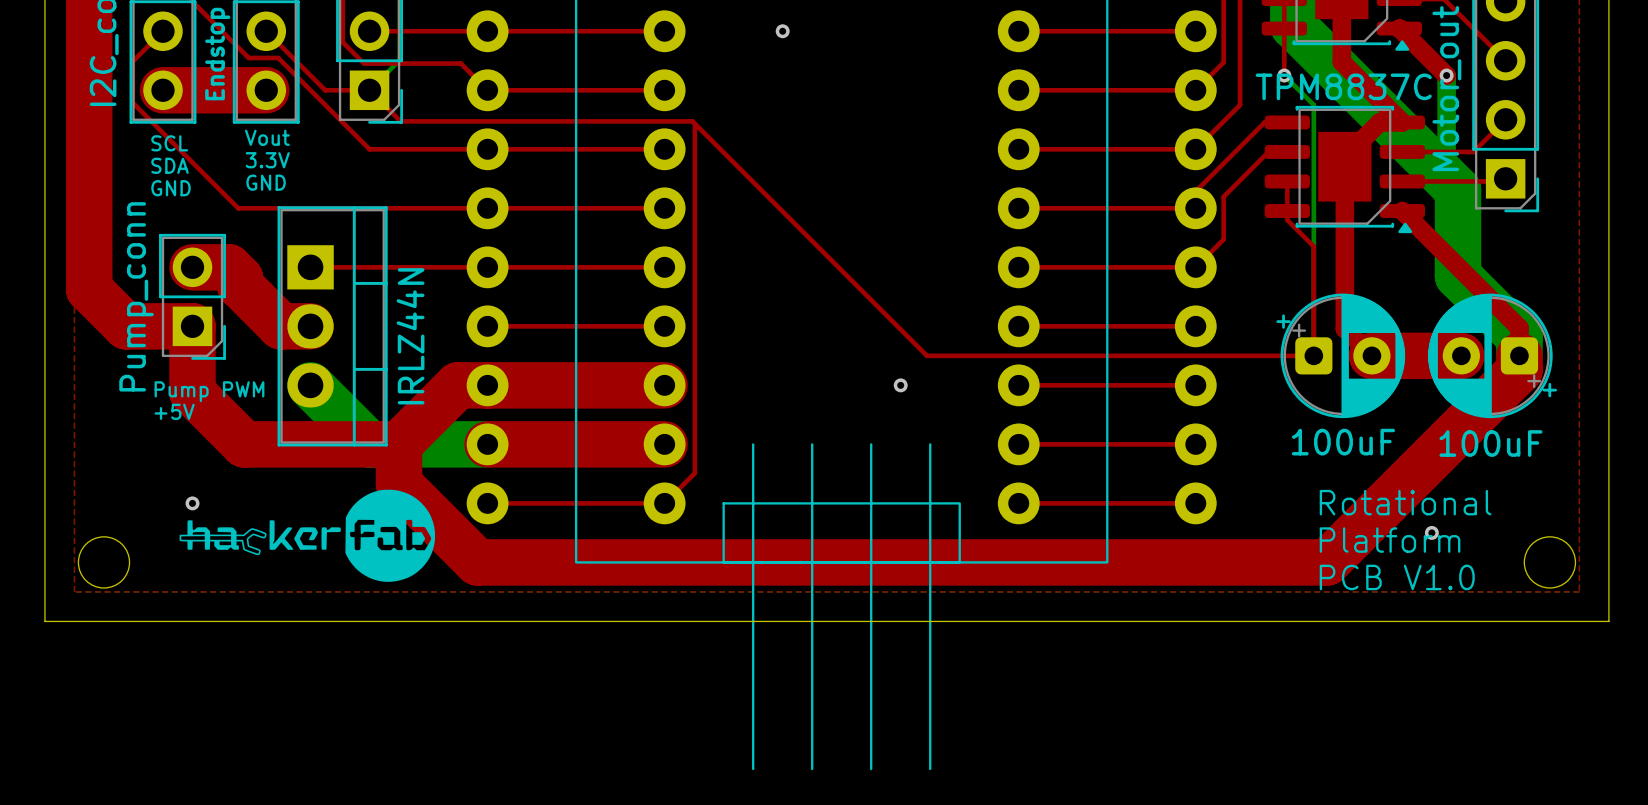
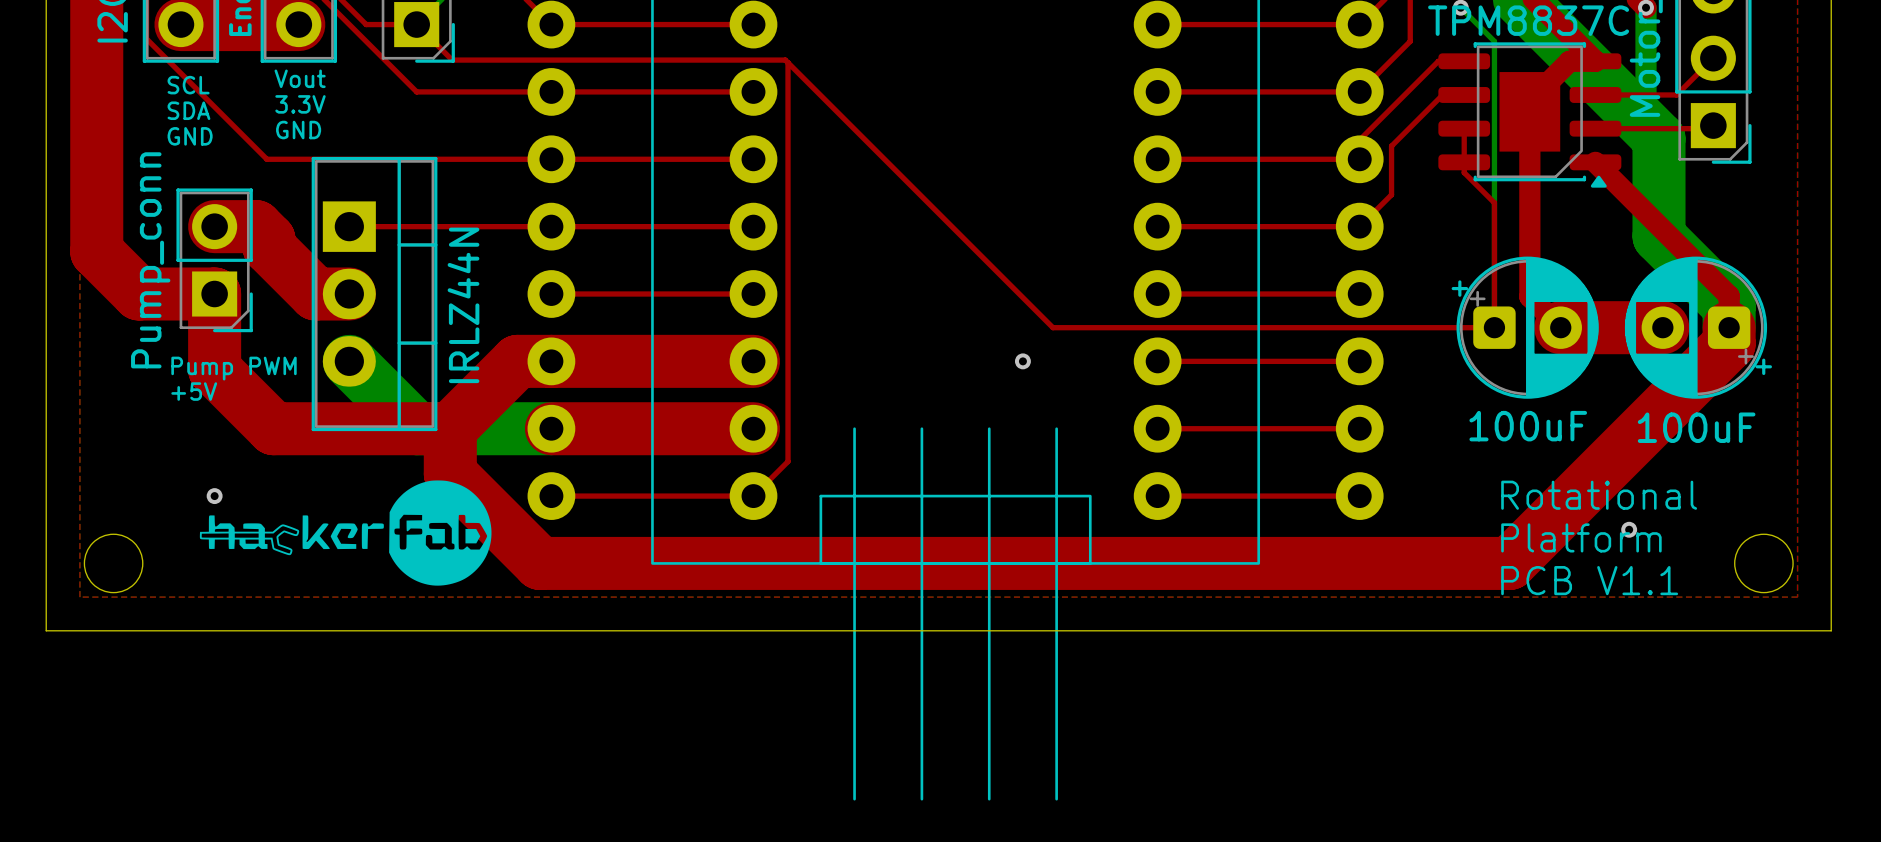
text: PCB V1.0 (1397, 577) -> PCB V1.1 (1589, 580)

